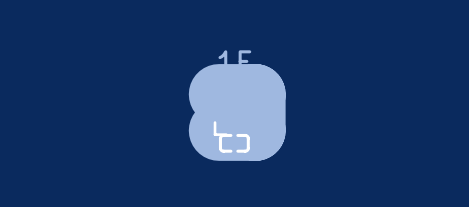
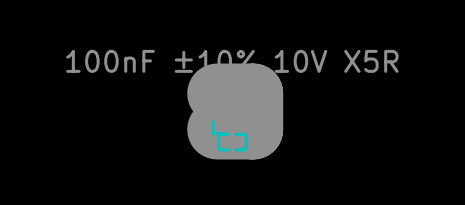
part value: 1F (234, 61) -> 100nF ±10% 10V X5R (232, 61)

